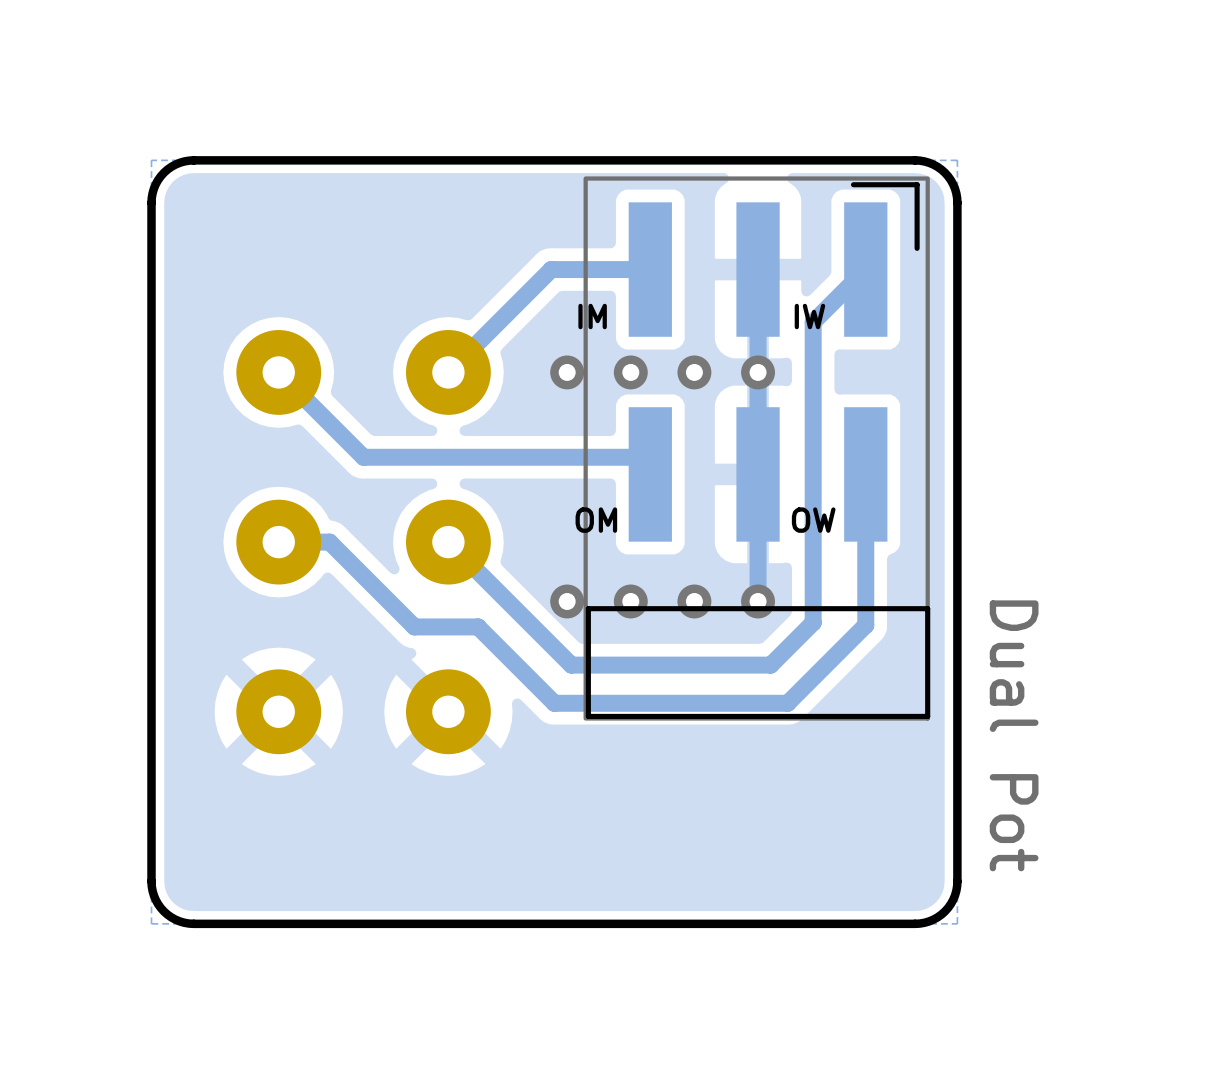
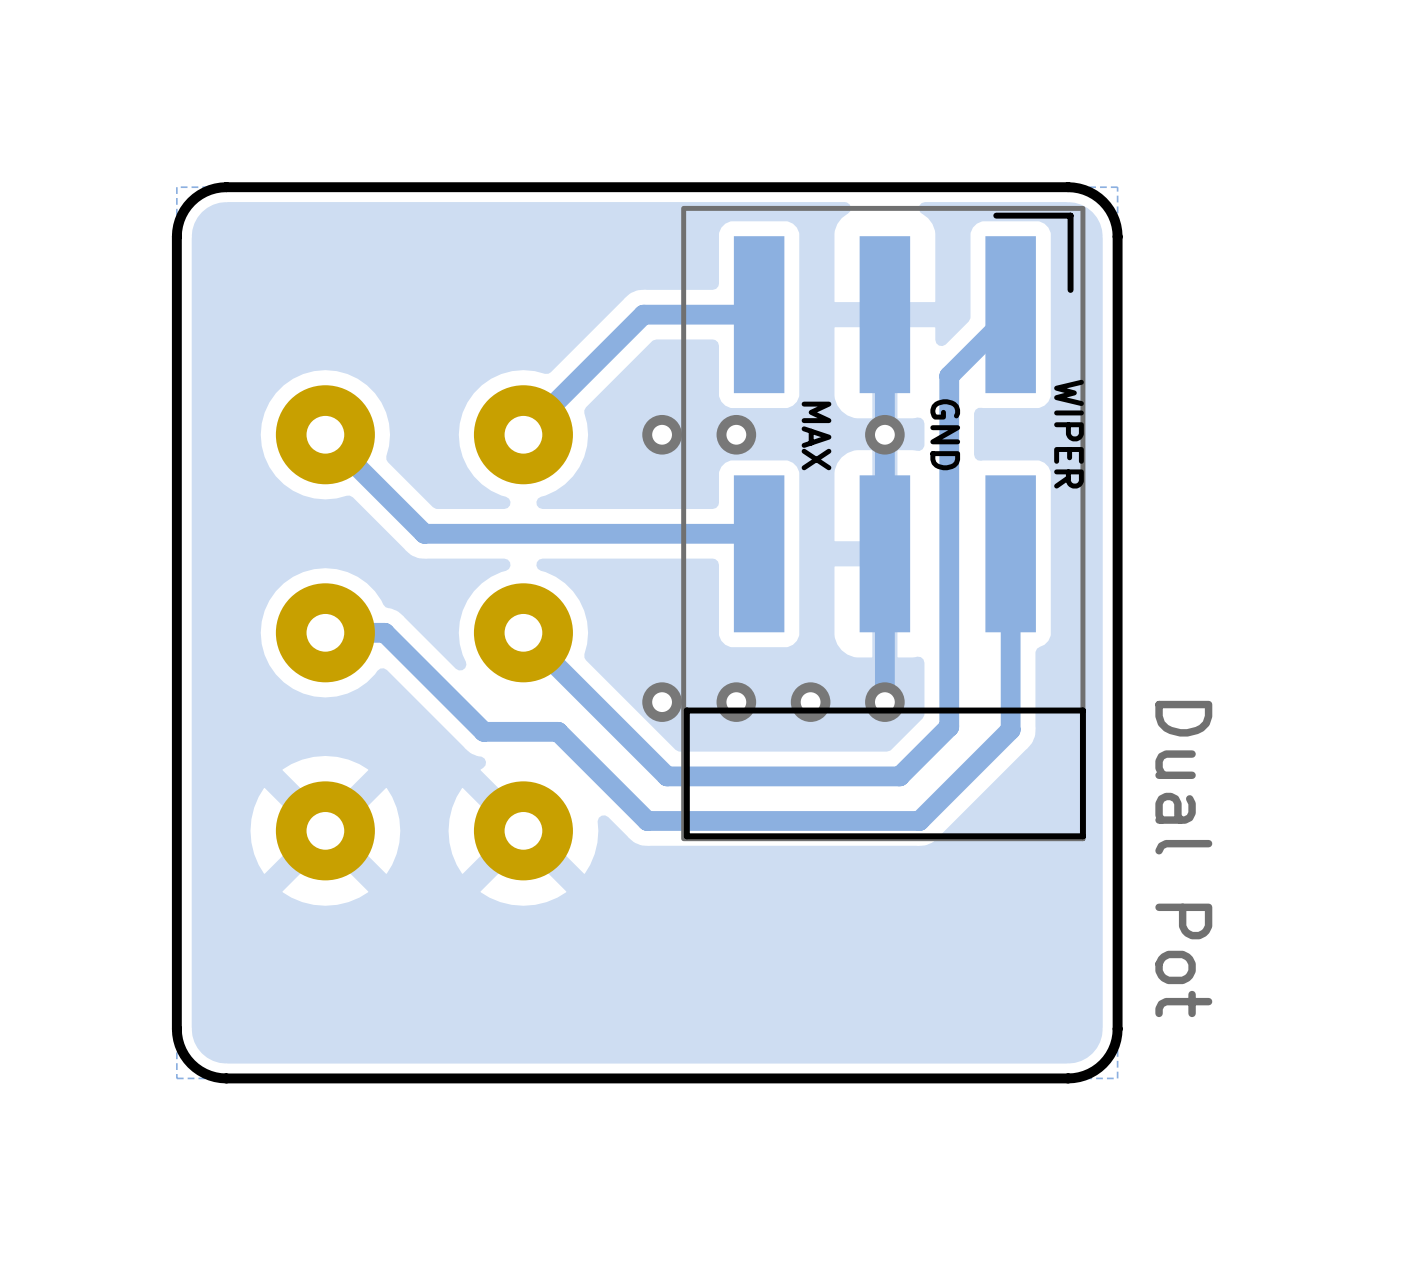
text: IM (592, 316) -> none
text: IW (809, 316) -> none
text: none -> WIPER (1069, 434)
via: (694, 372) -> none
text: none -> GND (945, 434)
text: none -> MAX (816, 435)
text: OM (596, 520) -> none
text: OW (813, 520) -> none

